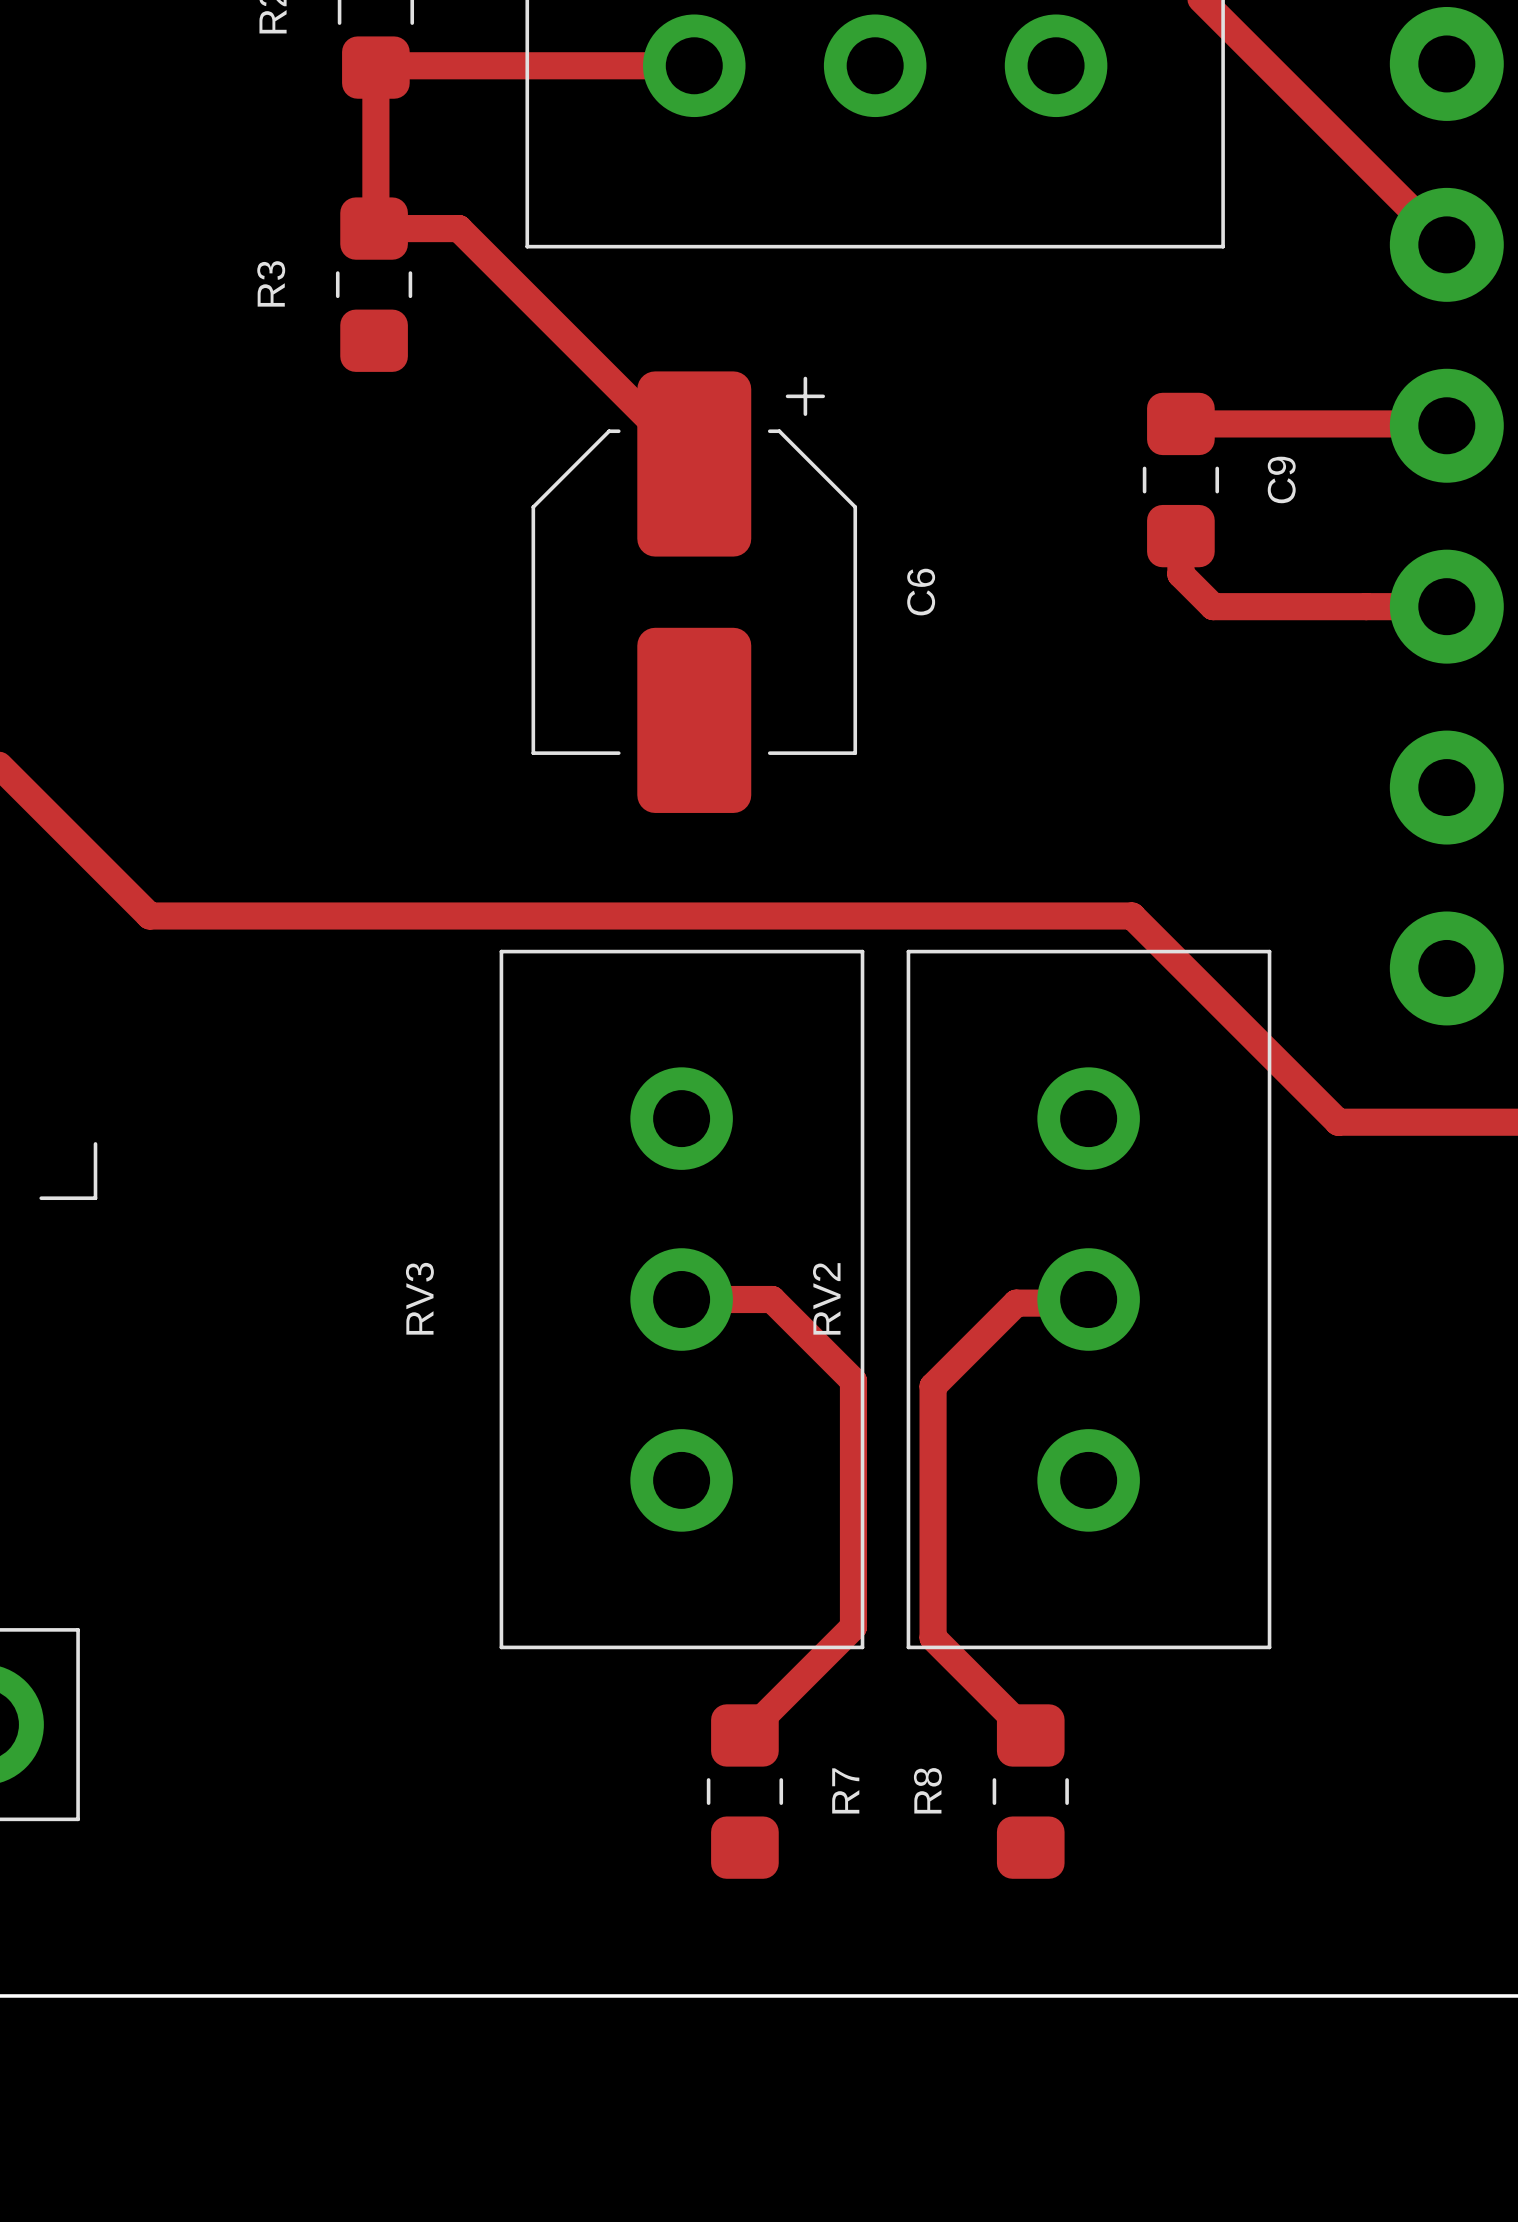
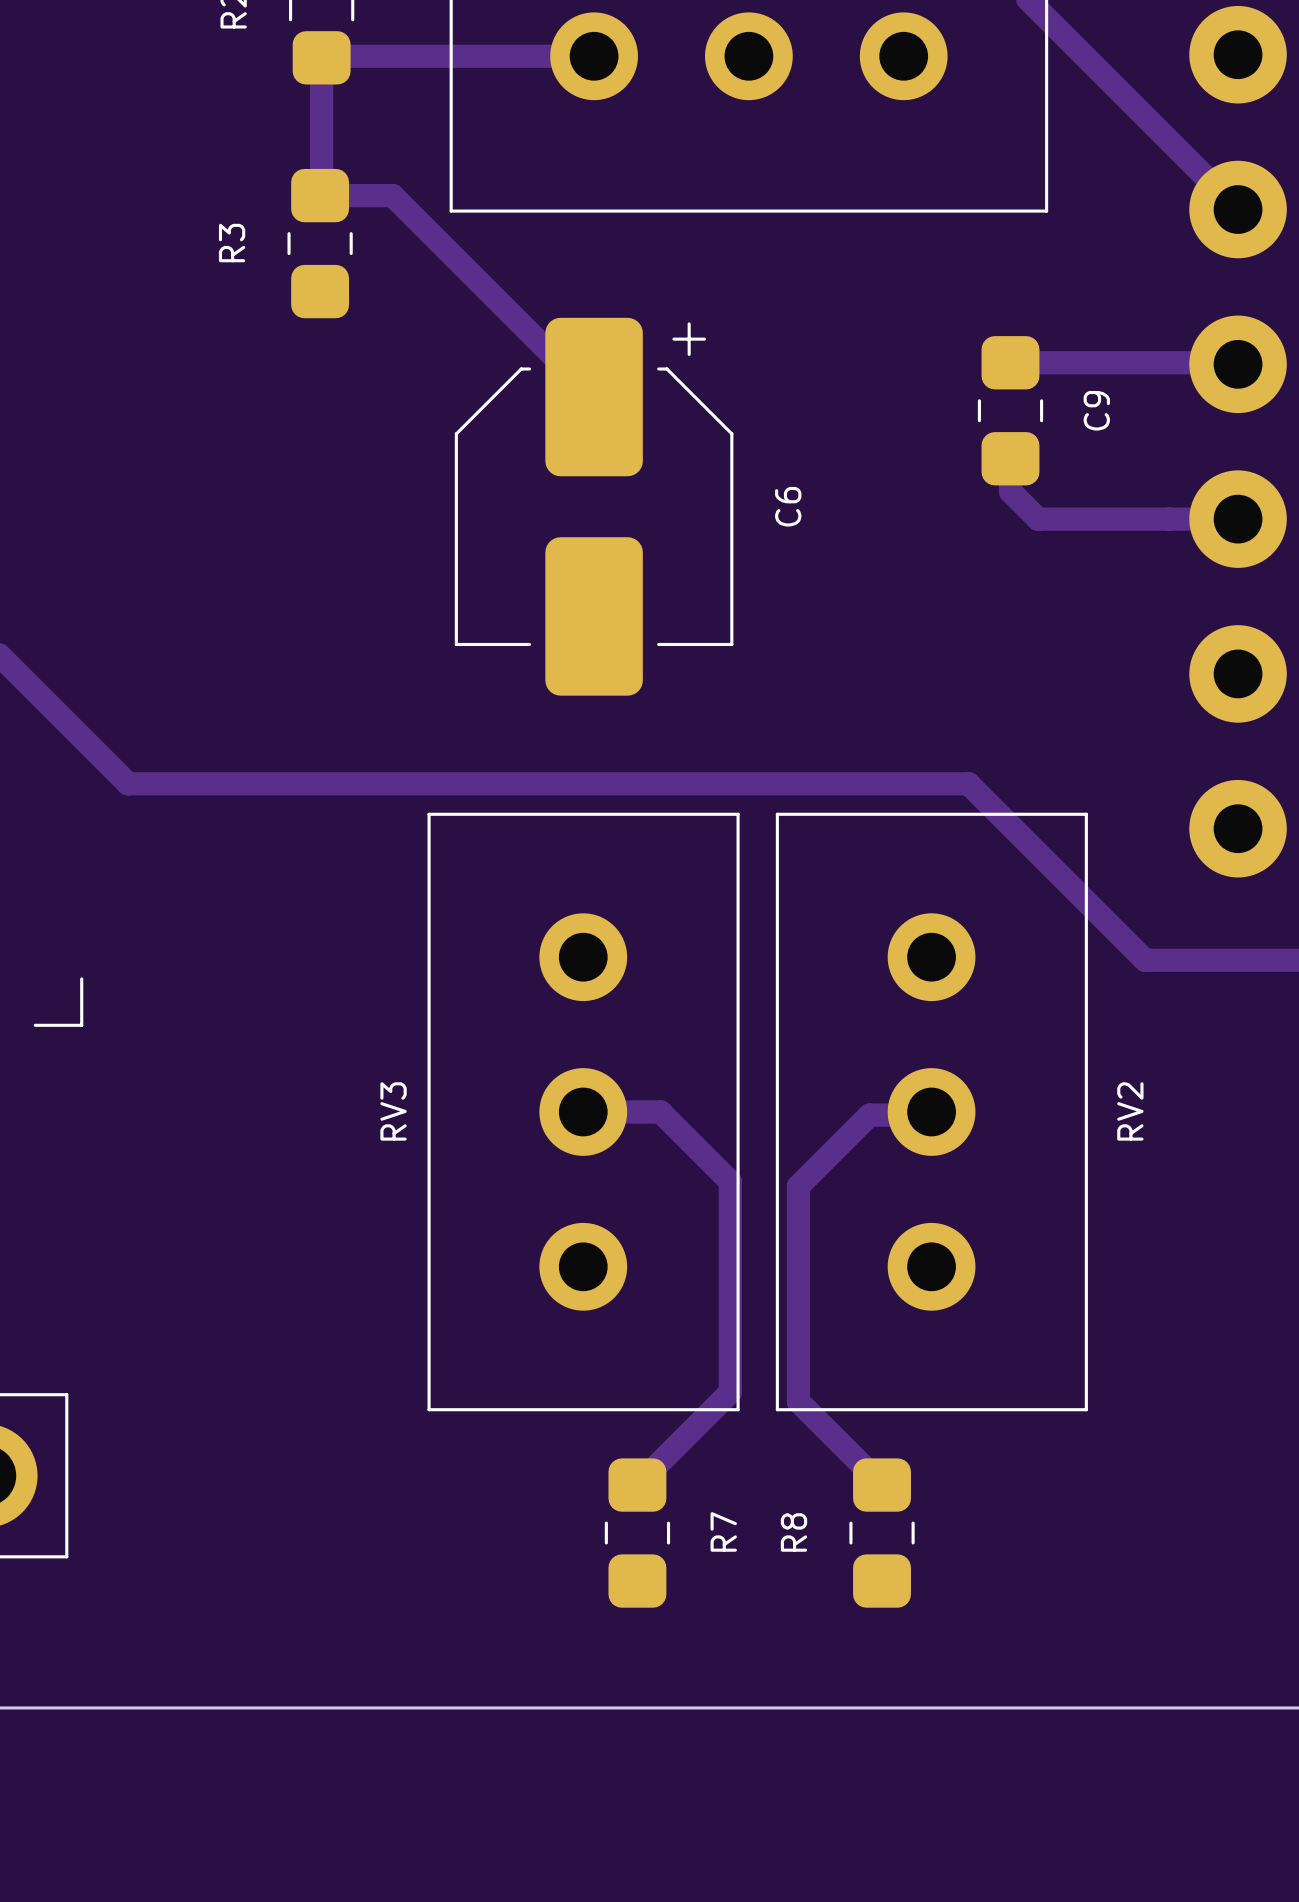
RV3 name position: RV3 (419, 1298) -> RV3 (393, 1111)
RV2 name position: RV2 (826, 1298) -> RV2 (1130, 1111)

